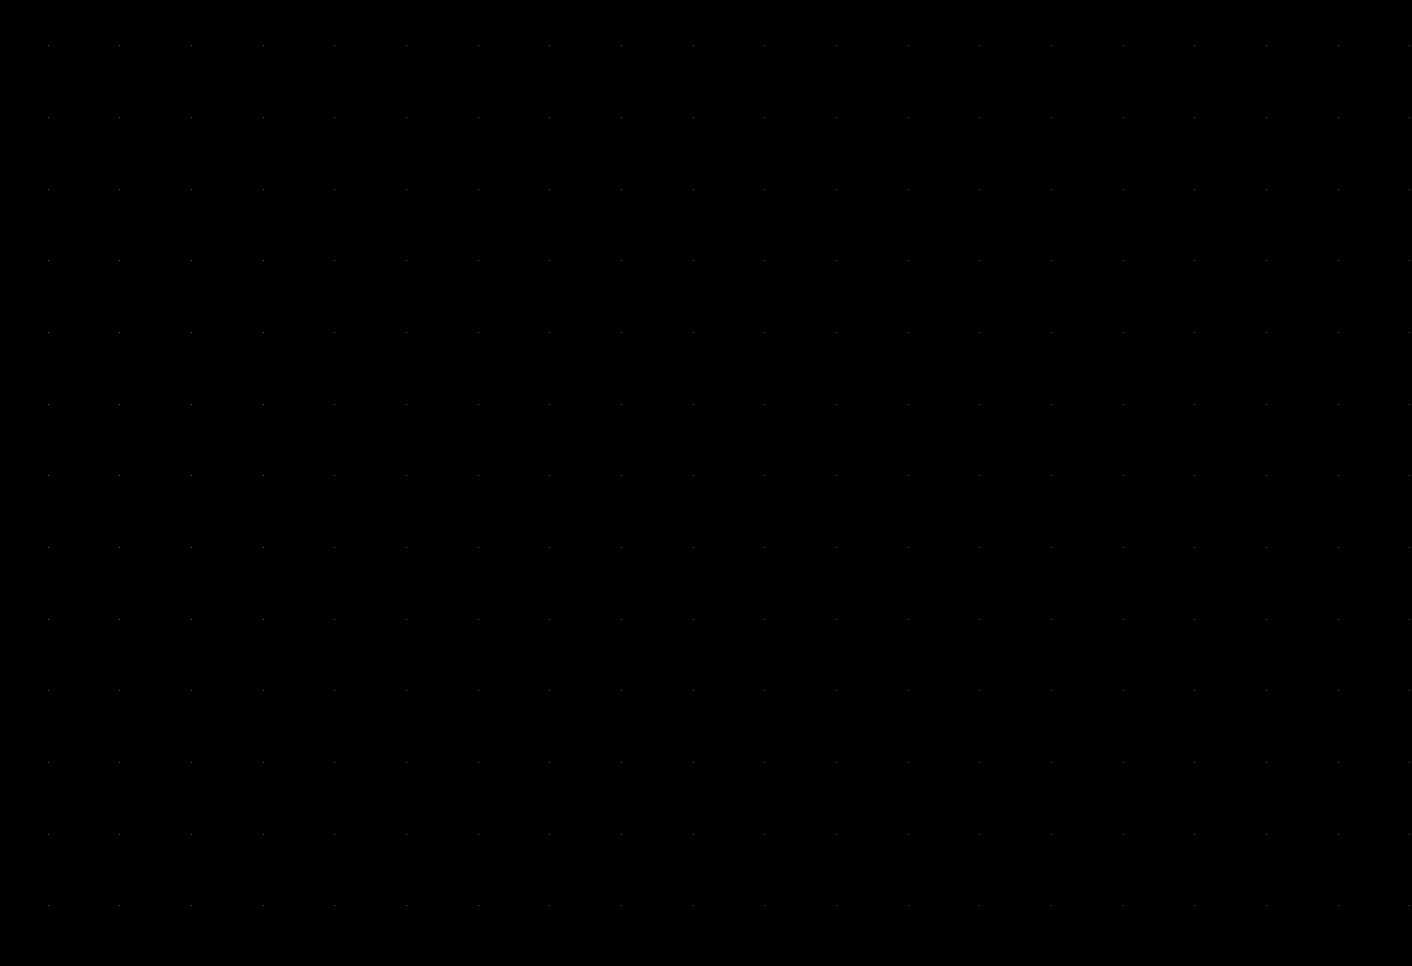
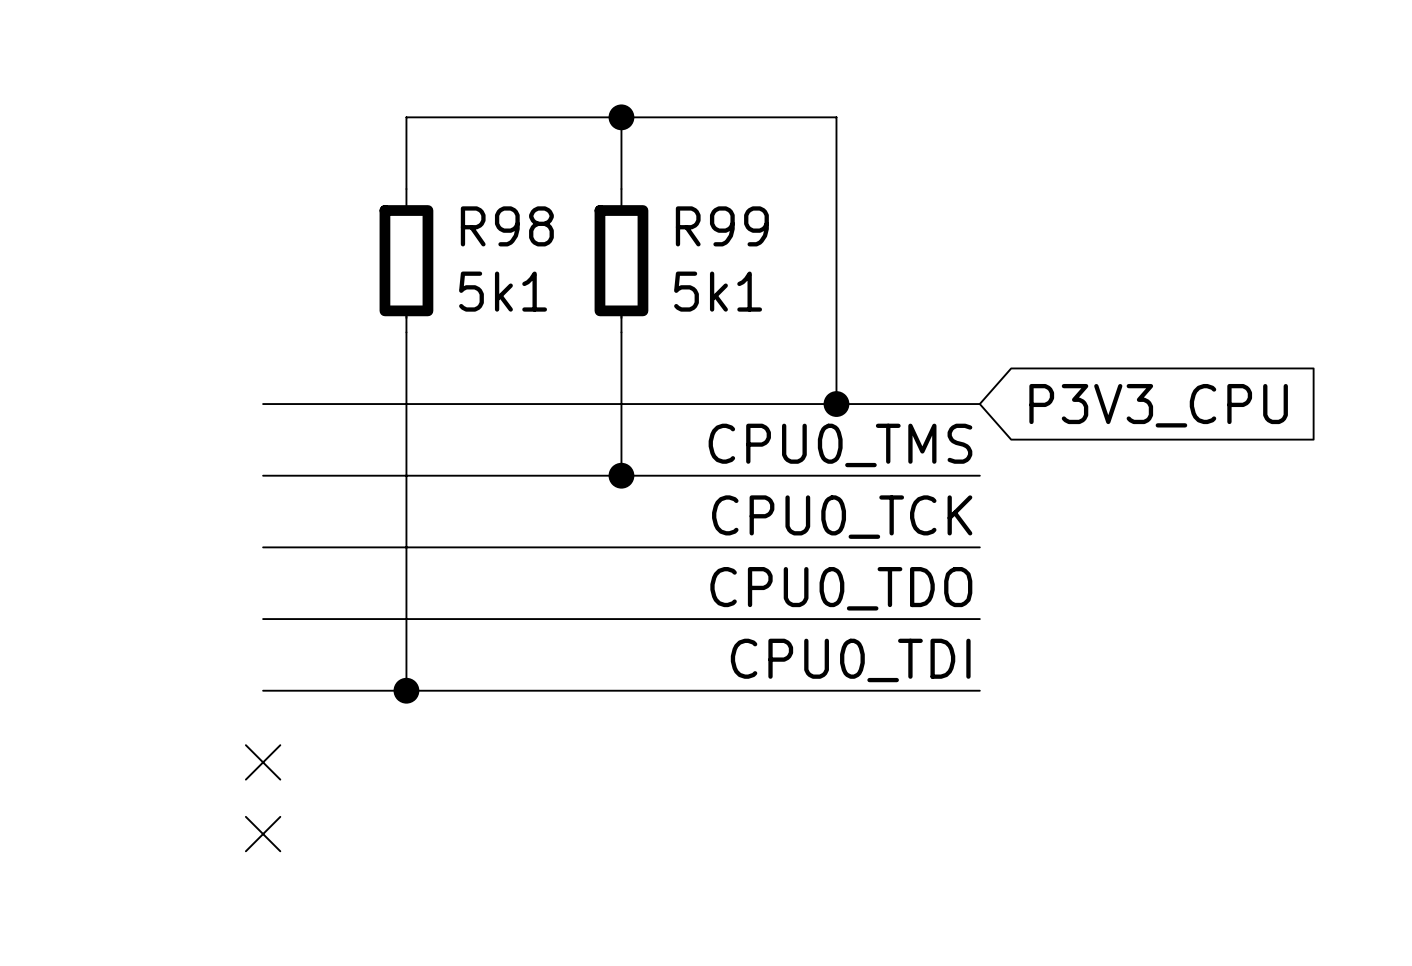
wire: none -> (621, 117) (621, 189)
junction: none -> (621, 117)
wire: none -> (406, 189) (406, 117) (836, 117) (836, 404)
R98: none -> 5k1 (406, 260)
R99: none -> 5k1 (621, 260)
wire: none -> (406, 332) (406, 690)
wire: none -> (621, 332) (621, 475)
wire: none -> (263, 404) (979, 404)
junction: none -> (836, 404)
global label: none -> P3V3_CPU (1158, 405)
label: none -> CPU0_TMS (840, 445)
wire: none -> (263, 475) (979, 475)
junction: none -> (621, 475)
label: none -> CPU0_TCK (842, 517)
wire: none -> (263, 547) (979, 547)
label: none -> CPU0_TDO (841, 588)
wire: none -> (263, 619) (979, 619)
label: none -> CPU0_TDI (850, 660)
wire: none -> (263, 690) (979, 690)
junction: none -> (406, 690)
no-connect mark: none -> (263, 762)
no-connect mark: none -> (263, 834)

